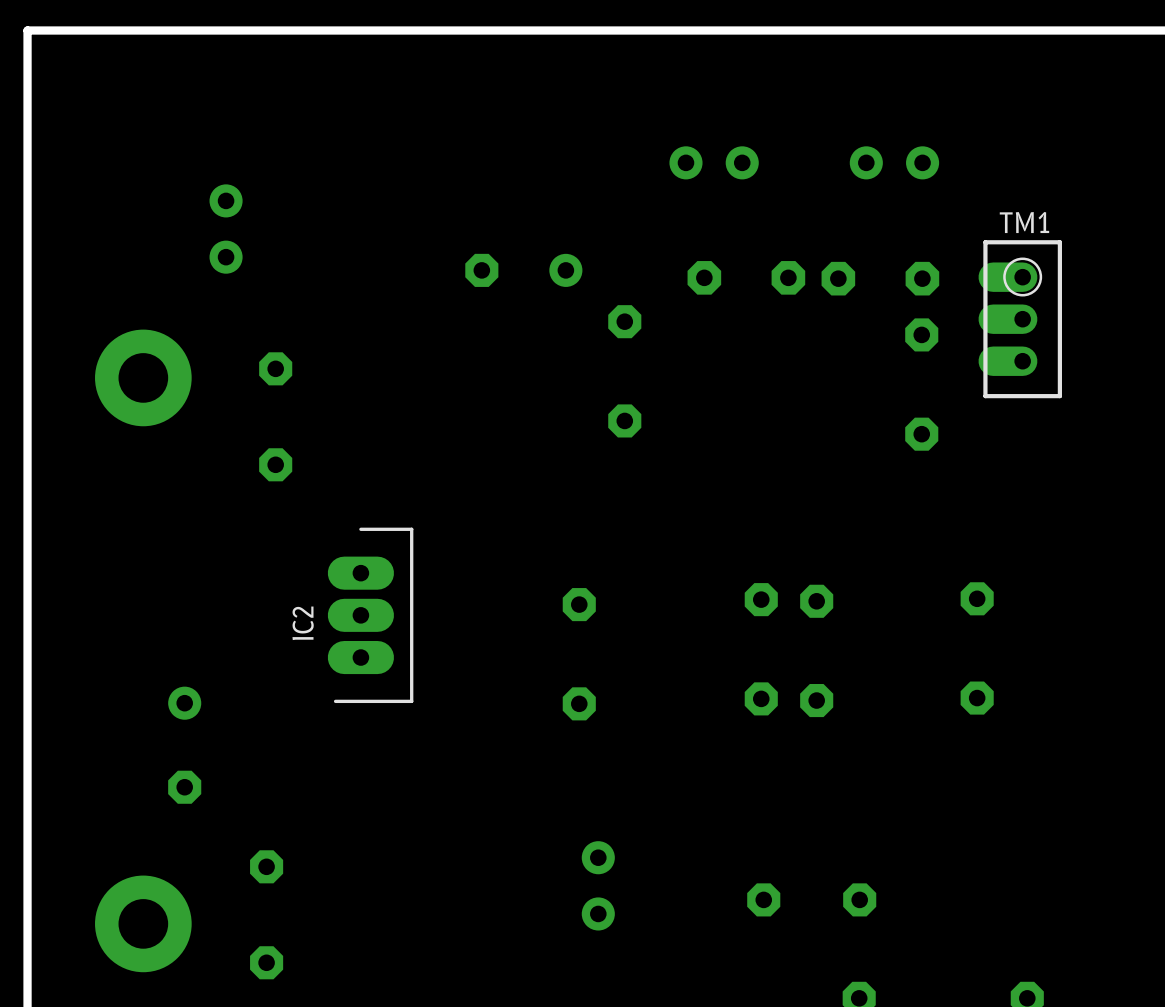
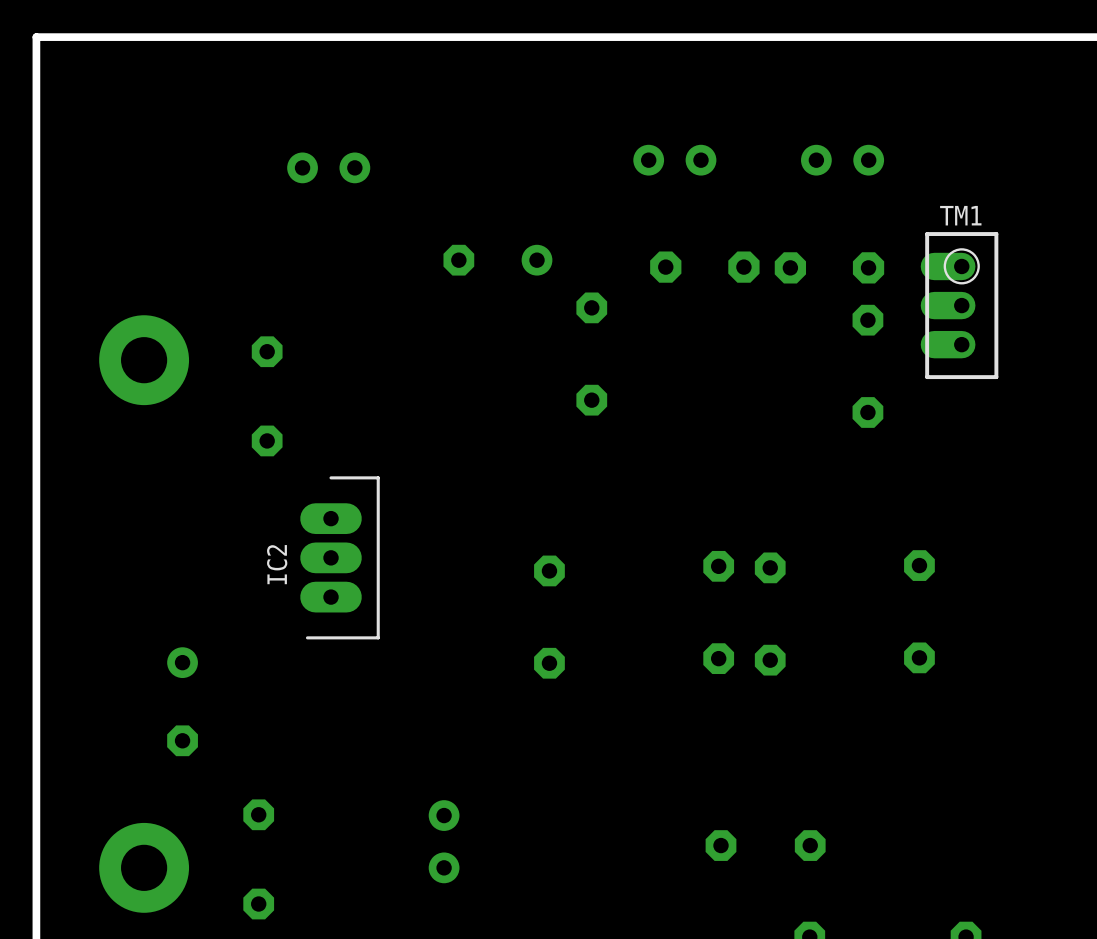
part rotation: 0° (226, 229) -> 90° clockwise (328, 167)
part position: (226, 229) -> (328, 167)
IC2 position: (370, 615) -> (340, 557)
part position: (598, 885) -> (444, 841)

